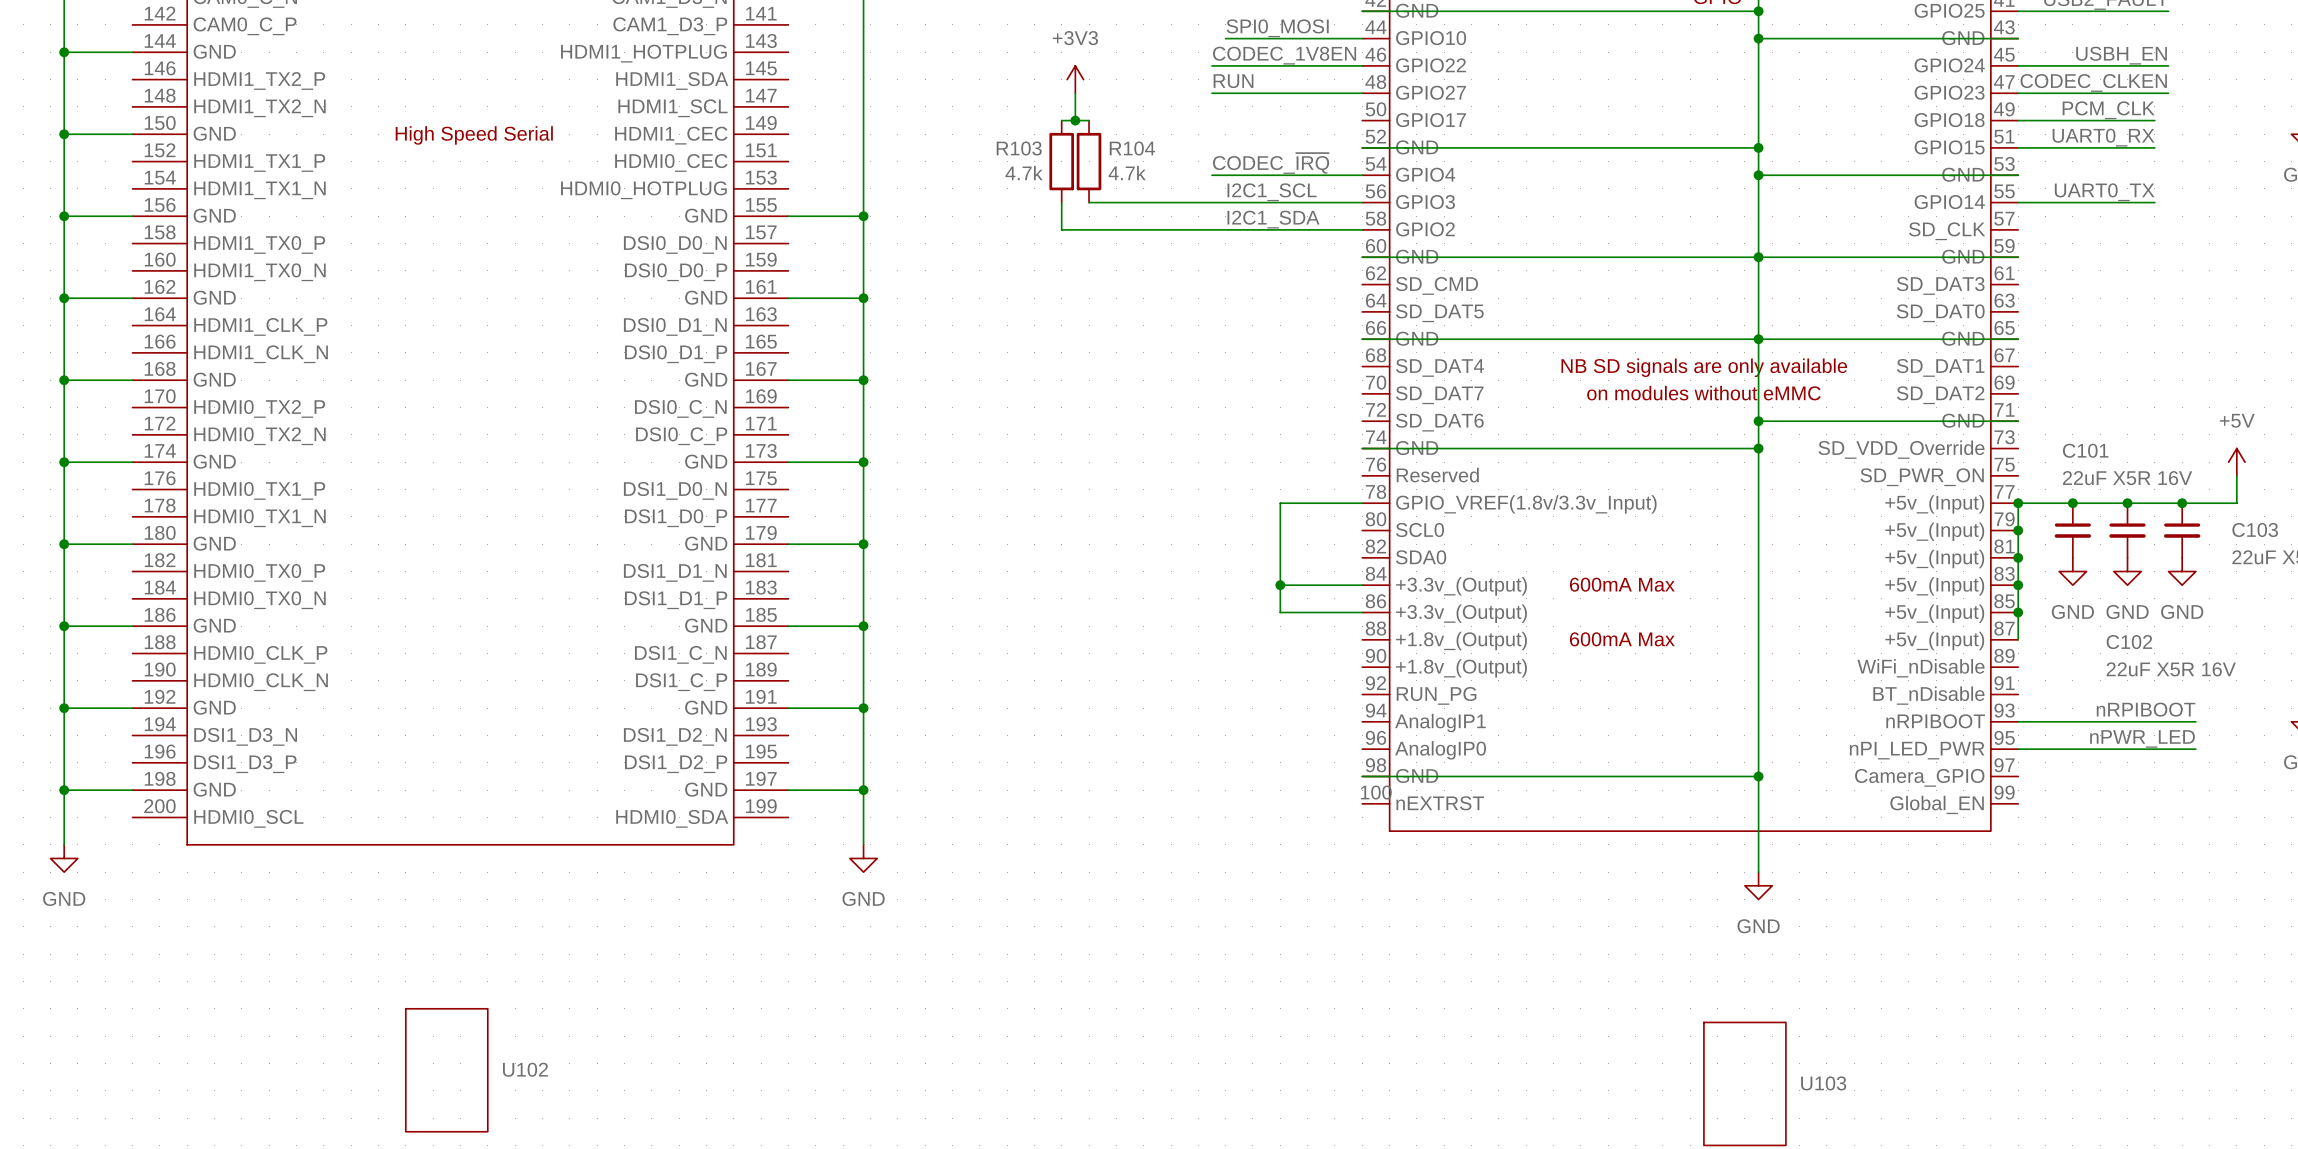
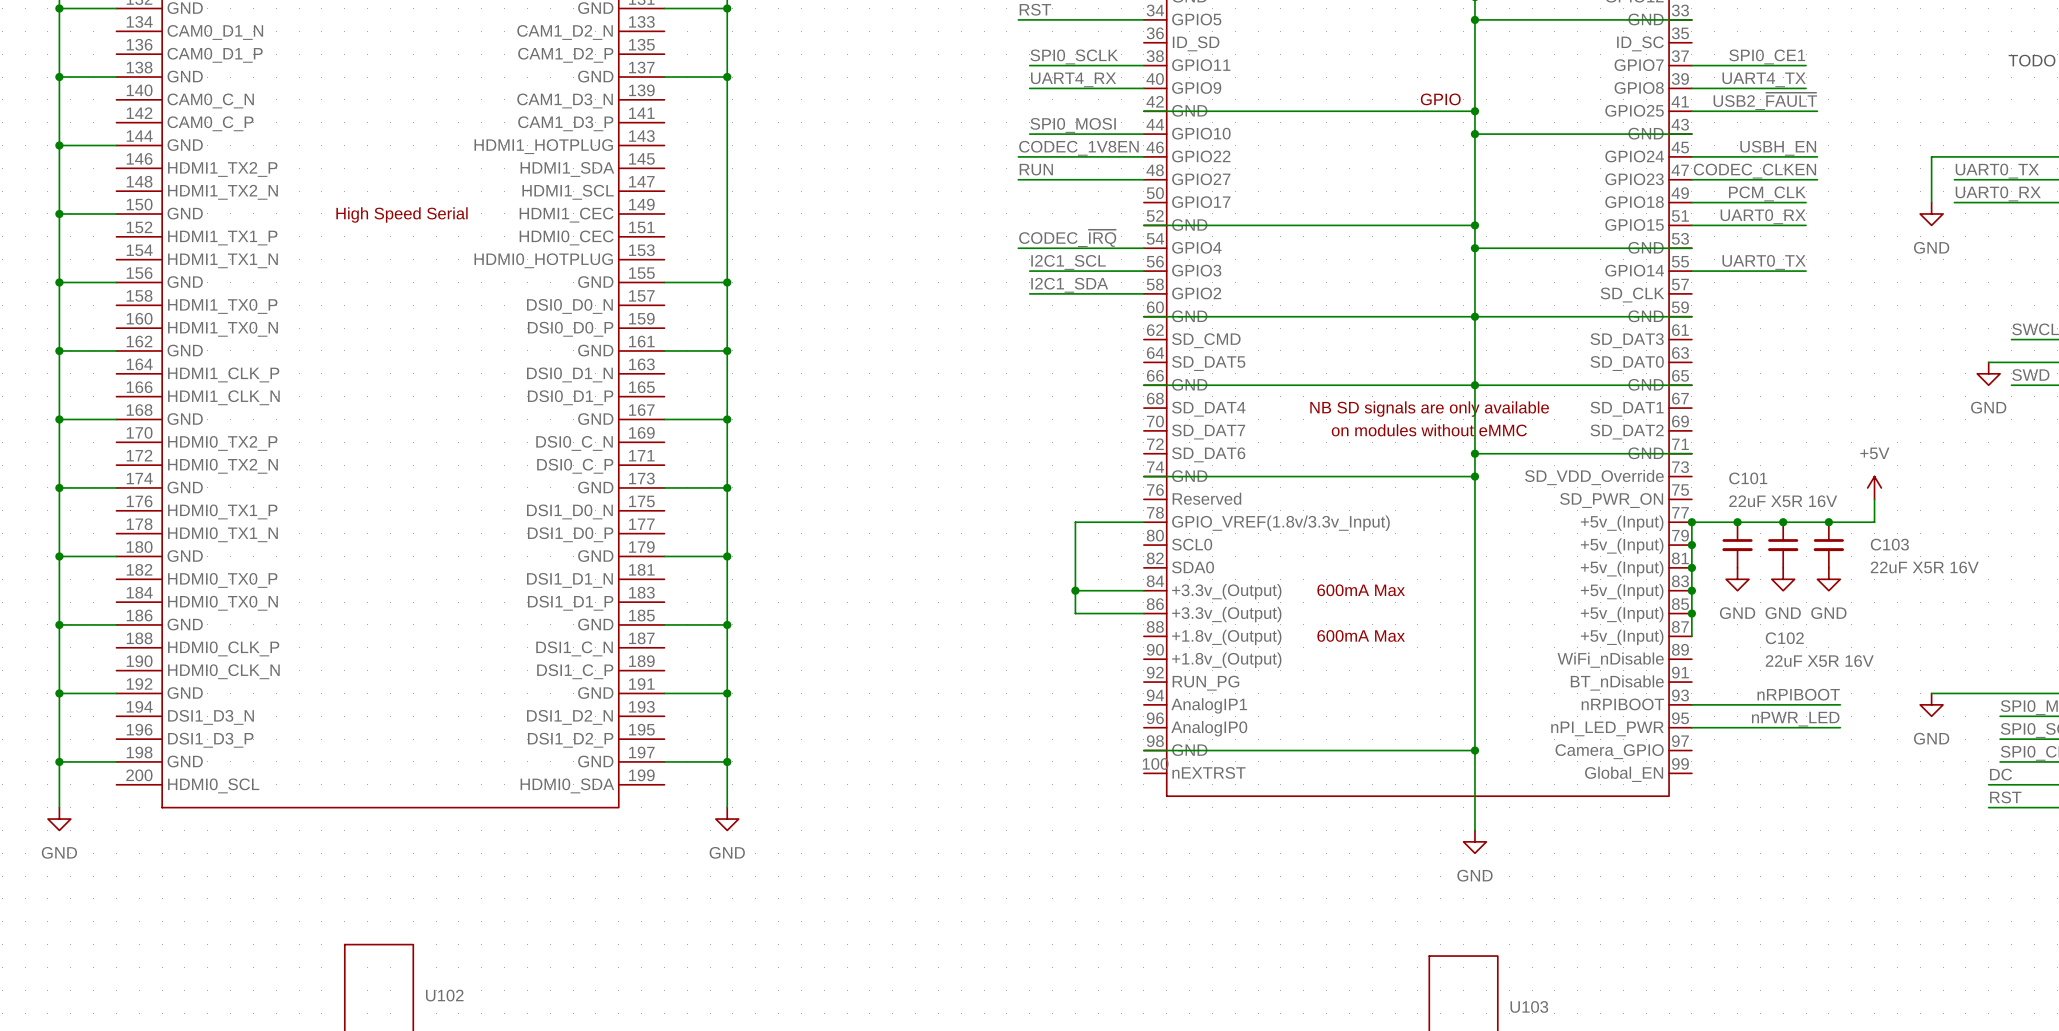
power symbol: +3V3 (1075, 79) -> none
wire: (1075, 93) (1075, 120) -> none
wire: (1061, 120) (1089, 120) -> none
junction: (1075, 120) -> none
R103: 4.7k (1061, 161) -> none
R104: 4.7k (1089, 161) -> none
wire: (1061, 202) (1061, 229) (1225, 229) -> none
wire: (1089, 202) (1225, 202) -> none

